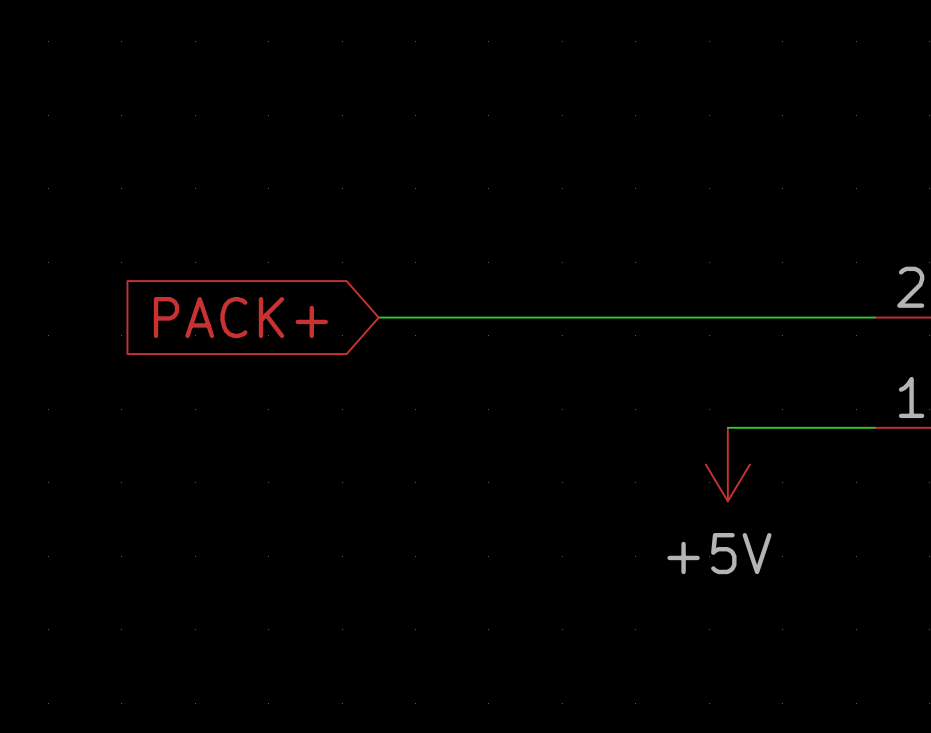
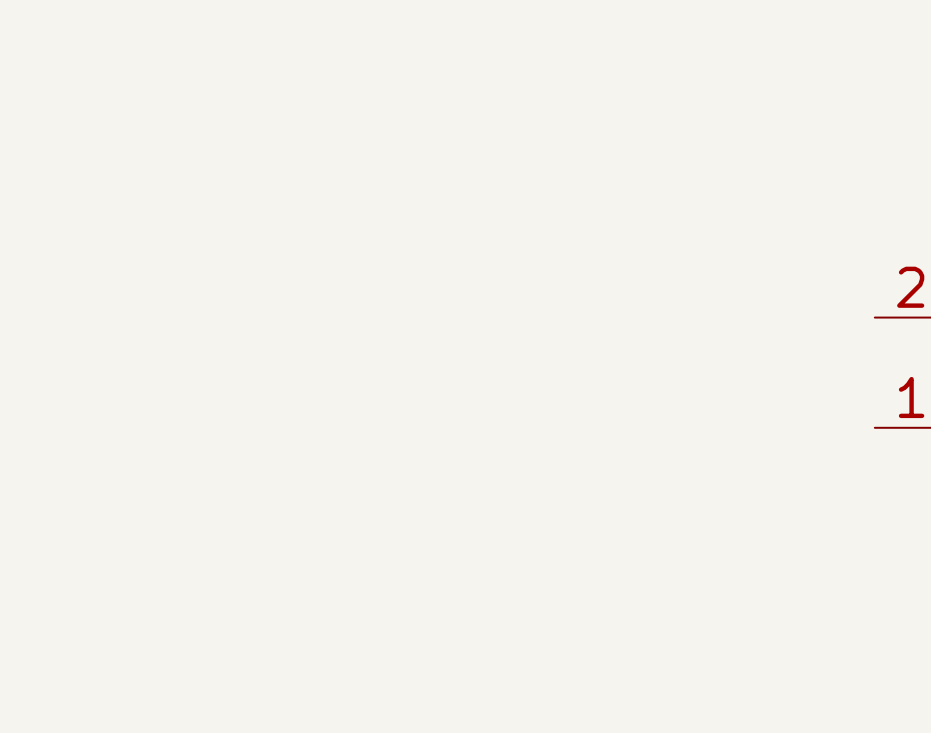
global label: PACK+ (240, 317) -> none
wire: (378, 317) (874, 317) -> none
wire: (727, 427) (874, 427) -> none
power symbol: +5V (727, 464) -> none

